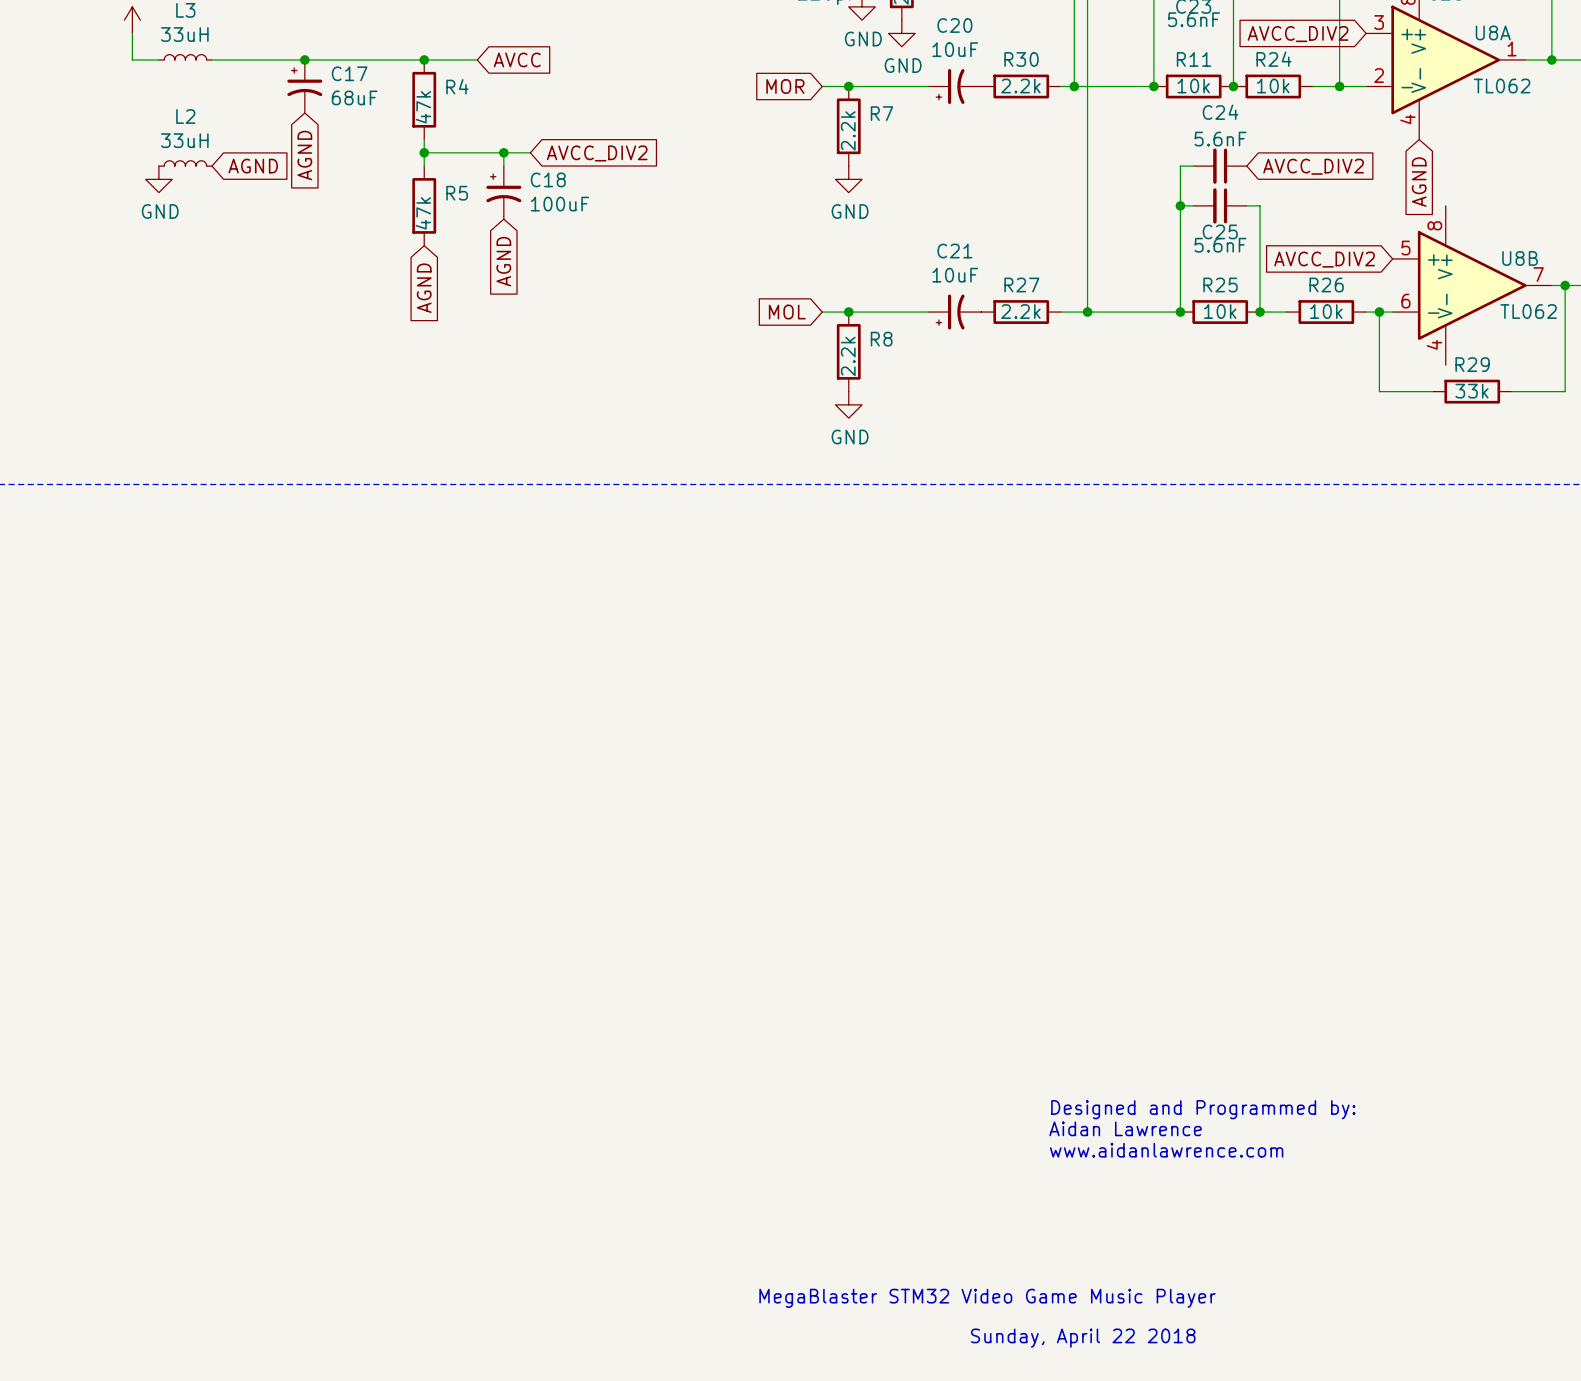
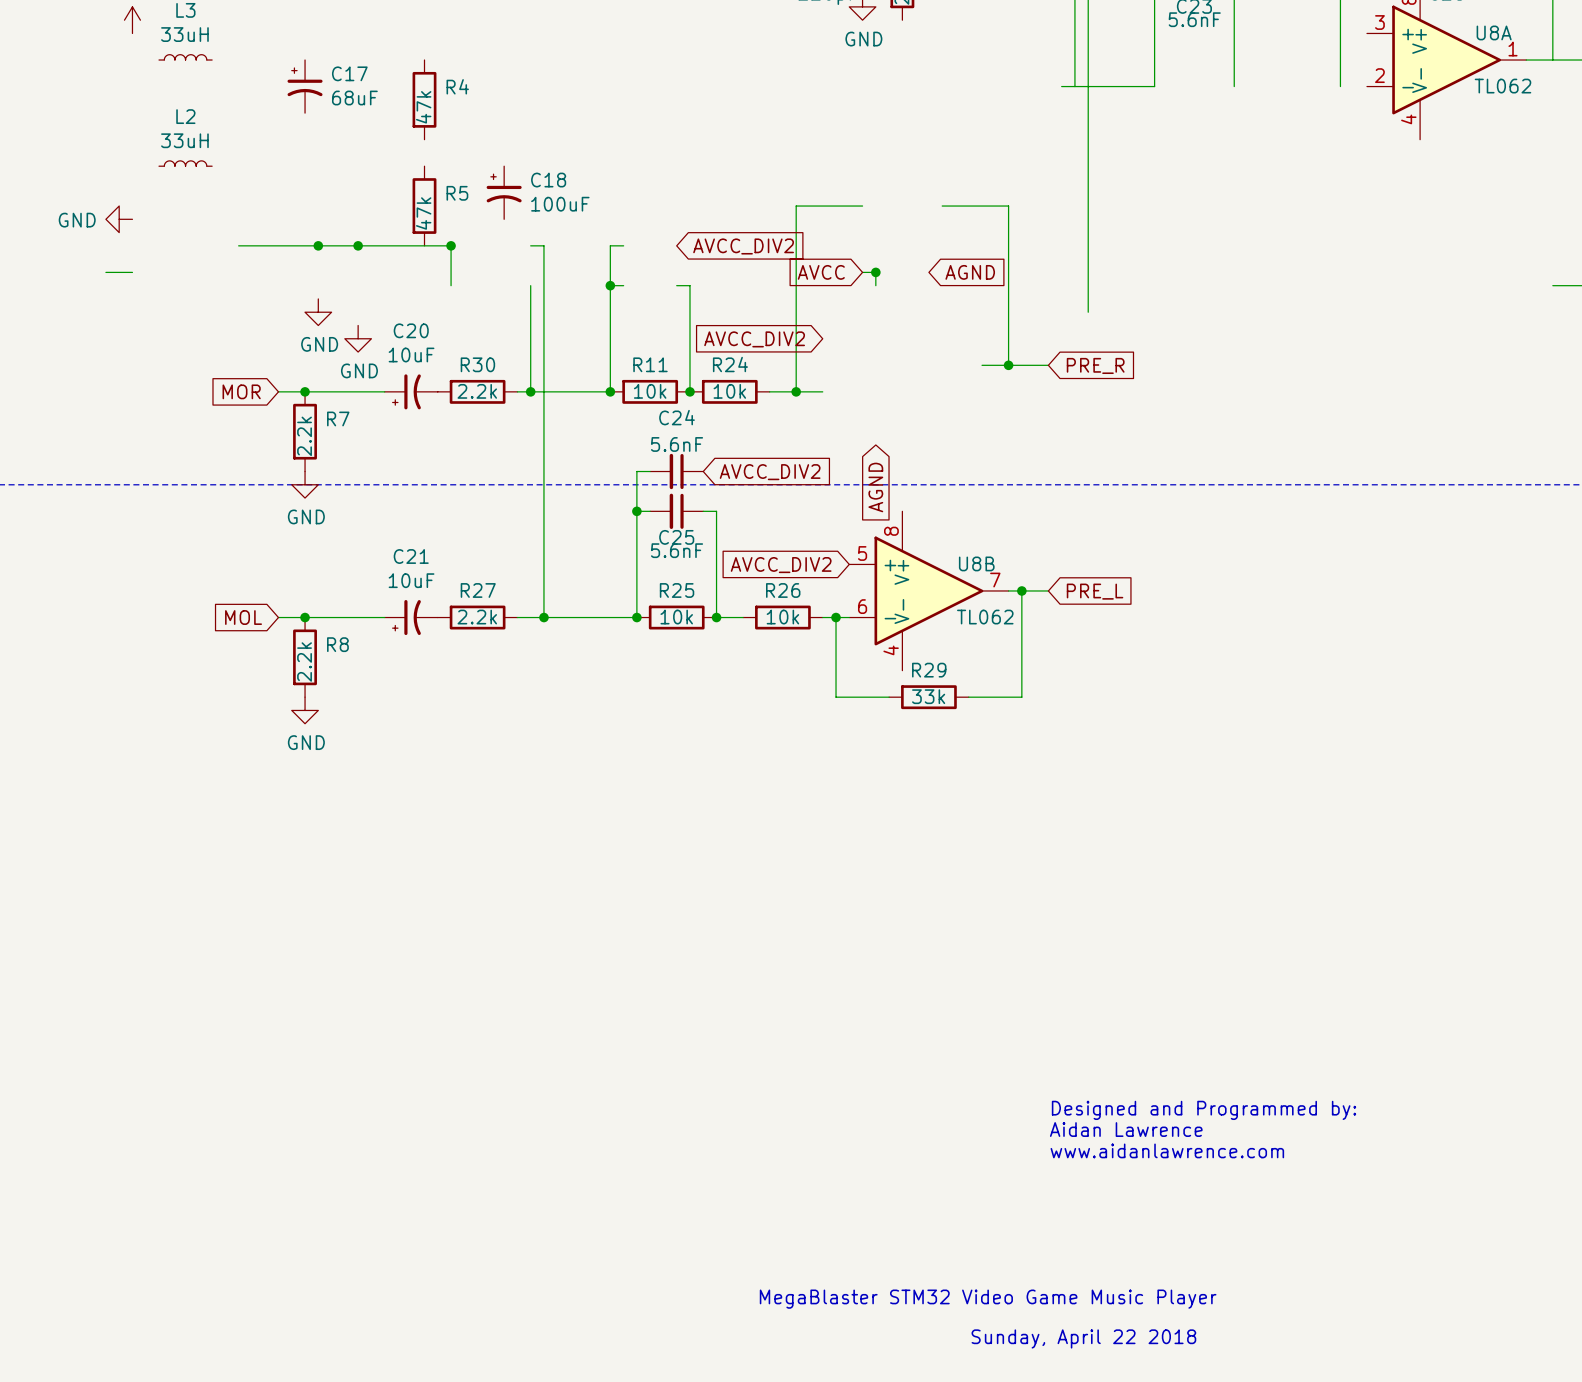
wire: (132, 33) (132, 59) (158, 59) -> none
power symbol: GND (901, 33) -> none
global label: AVCC_DIV2 (1298, 34) -> none
wire: (211, 59) (477, 59) -> none
junction: (304, 59) -> none
junction: (424, 59) -> none
global label: AVCC (517, 59) -> none
junction: (1551, 59) -> none
global label: MOR (785, 86) -> none
wire: (822, 86) (928, 86) -> none
junction: (848, 86) -> none
C20 position: (954, 86) -> (411, 391)
R30 position: (1021, 86) -> (477, 391)
junction: (1074, 86) -> none
junction: (1153, 86) -> none
R11 position: (1193, 86) -> (650, 391)
junction: (1233, 86) -> none
R24 position: (1273, 86) -> (729, 391)
wire: (1313, 86) (1366, 86) -> none
junction: (1339, 86) -> none
R7 position: (848, 126) -> (305, 431)
wire: (424, 139) (424, 166) -> none
wire: (424, 152) (530, 152) -> none
junction: (424, 152) -> none
wire: (503, 152) (503, 166) -> none
junction: (503, 152) -> none
global label: AVCC_DIV2 (597, 153) -> none
global label: AGND (304, 155) -> none
global label: AGND (253, 166) -> none
wire: (1193, 166) (1180, 166) (1180, 312) (1061, 312) -> none
C24 position: (1220, 166) -> (676, 471)
global label: AVCC_DIV2 (1313, 166) -> none
power symbol rotation: 0° (158, 179) -> 90° clockwise (119, 219)
power symbol position: GND (158, 179) -> GND (119, 219)
power symbol: GND (848, 179) -> none
global label: AGND (1419, 182) -> none
wire: none -> (862, 206) (796, 206) (796, 391)
wire: none -> (942, 206) (1008, 206) (1008, 365)
wire: (1180, 205) (1193, 205) -> none
junction: (1180, 205) -> none
C25 position: (1220, 205) -> (676, 511)
wire: (1246, 205) (1260, 205) (1260, 312) (1286, 312) -> none
wire: none -> (238, 245) (451, 245) (451, 285)
junction: none -> (318, 245)
junction: none -> (358, 245)
junction: none -> (451, 245)
wire: none -> (530, 245) (543, 245) (543, 617)
wire: none -> (623, 245) (610, 245) (610, 391) (517, 391)
global label: none -> AVCC_DIV2 (743, 246)
global label: AVCC_DIV2 (1324, 259) -> none
global label: AGND (503, 261) -> none
wire: none -> (105, 272) (132, 272)
global label: none -> AVCC (821, 272)
wire: none -> (862, 272) (875, 272) (875, 285)
junction: none -> (875, 272)
global label: none -> AGND (970, 272)
wire: none -> (530, 285) (530, 391)
wire: none -> (610, 285) (623, 285)
junction: none -> (610, 285)
wire: none -> (676, 285) (689, 285) (689, 391)
U8B position: (1472, 285) -> (928, 590)
wire: (1565, 285) (1565, 391) (1512, 391) -> none
junction: (1565, 285) -> none
global label: AGND (424, 288) -> none
power symbol: none -> GND (318, 312)
global label: MOL (787, 312) -> none
wire: (822, 312) (928, 312) -> none
junction: (848, 312) -> none
C21 position: (954, 312) -> (411, 617)
R27 position: (1021, 312) -> (477, 617)
junction: (1087, 312) -> none
junction: (1180, 312) -> none
R25 position: (1220, 312) -> (676, 617)
junction: (1260, 312) -> none
R26 position: (1326, 312) -> (782, 617)
wire: (1366, 312) (1392, 312) -> none
wire: (1379, 312) (1379, 391) (1432, 391) -> none
junction: (1379, 312) -> none
power symbol: none -> GND (358, 338)
global label: none -> AVCC_DIV2 (754, 339)
R8 position: (848, 351) -> (305, 657)
wire: none -> (982, 365) (1048, 365)
junction: none -> (1008, 365)
global label: none -> PRE_R (1095, 365)
global label: none -> MOR (241, 391)
wire: none -> (278, 391) (384, 391)
junction: none -> (305, 391)
junction: none -> (530, 391)
junction: none -> (610, 391)
junction: none -> (689, 391)
wire: none -> (769, 391) (822, 391)
junction: none -> (796, 391)
R29 position: (1472, 391) -> (928, 697)
power symbol: GND (848, 404) -> none
wire: none -> (650, 471) (636, 471) (636, 617) (517, 617)
global label: none -> AVCC_DIV2 (770, 472)
power symbol: none -> GND (305, 484)
global label: none -> AGND (875, 487)
wire: none -> (636, 511) (650, 511)
junction: none -> (636, 511)
wire: none -> (703, 511) (716, 511) (716, 617) (743, 617)
global label: none -> AVCC_DIV2 (781, 565)
wire: none -> (1008, 590) (1048, 590)
wire: none -> (1021, 590) (1021, 697) (968, 697)
junction: none -> (1021, 590)
global label: none -> PRE_L (1095, 591)
global label: none -> MOL (243, 617)
wire: none -> (278, 617) (384, 617)
junction: none -> (305, 617)
junction: none -> (543, 617)
junction: none -> (636, 617)
junction: none -> (716, 617)
wire: none -> (822, 617) (849, 617)
wire: none -> (836, 617) (836, 697) (889, 697)
junction: none -> (836, 617)
power symbol: none -> GND (305, 710)

